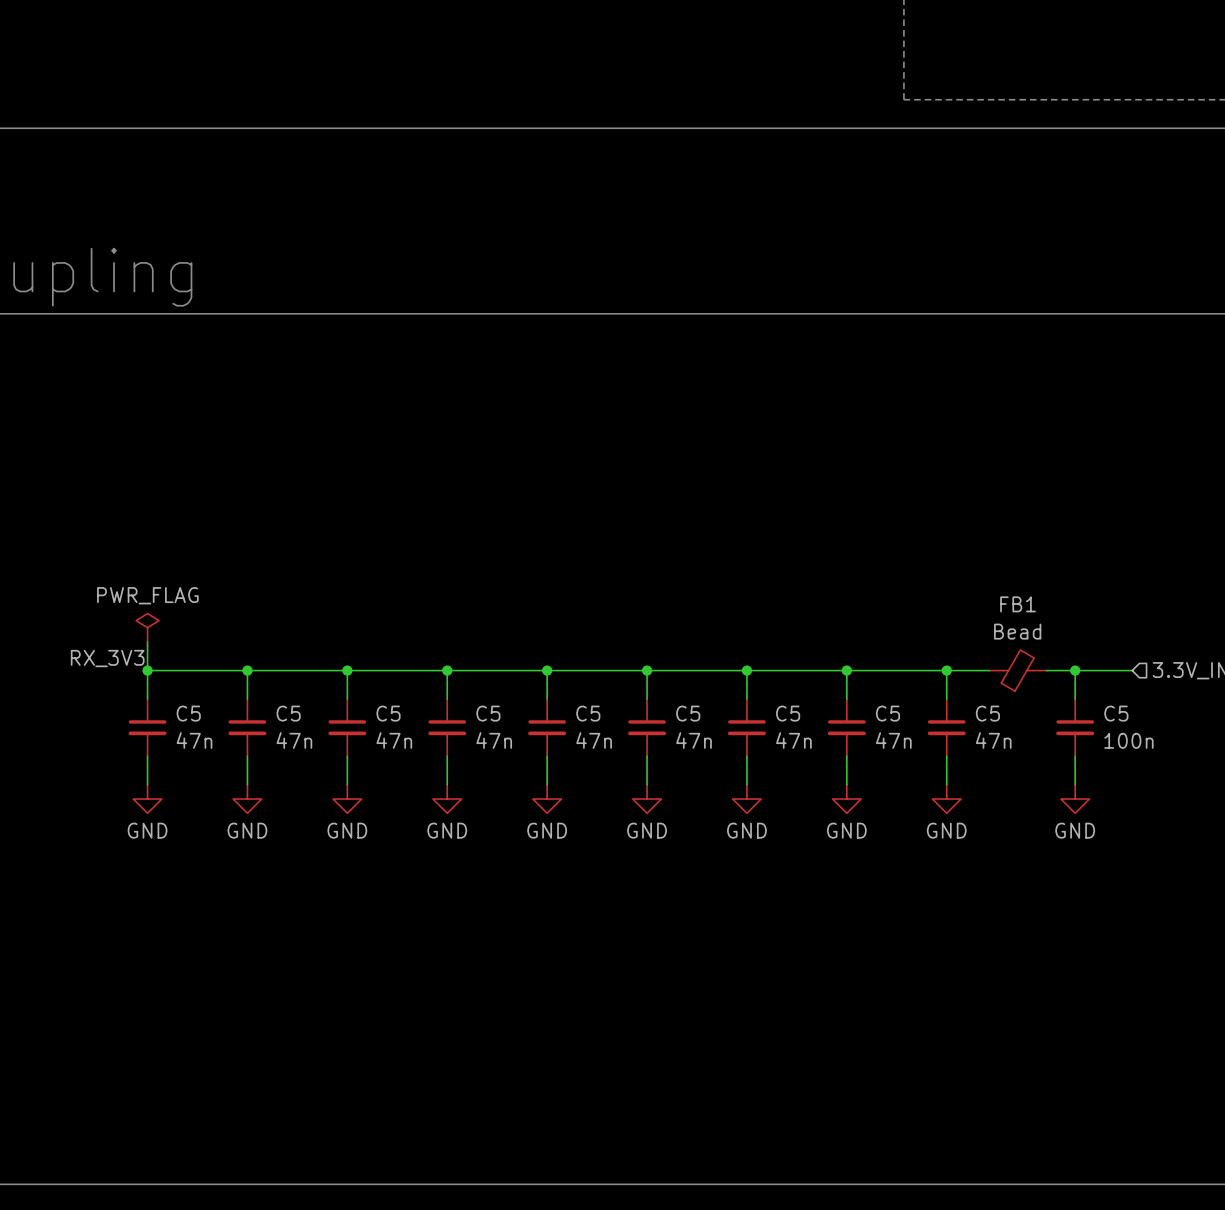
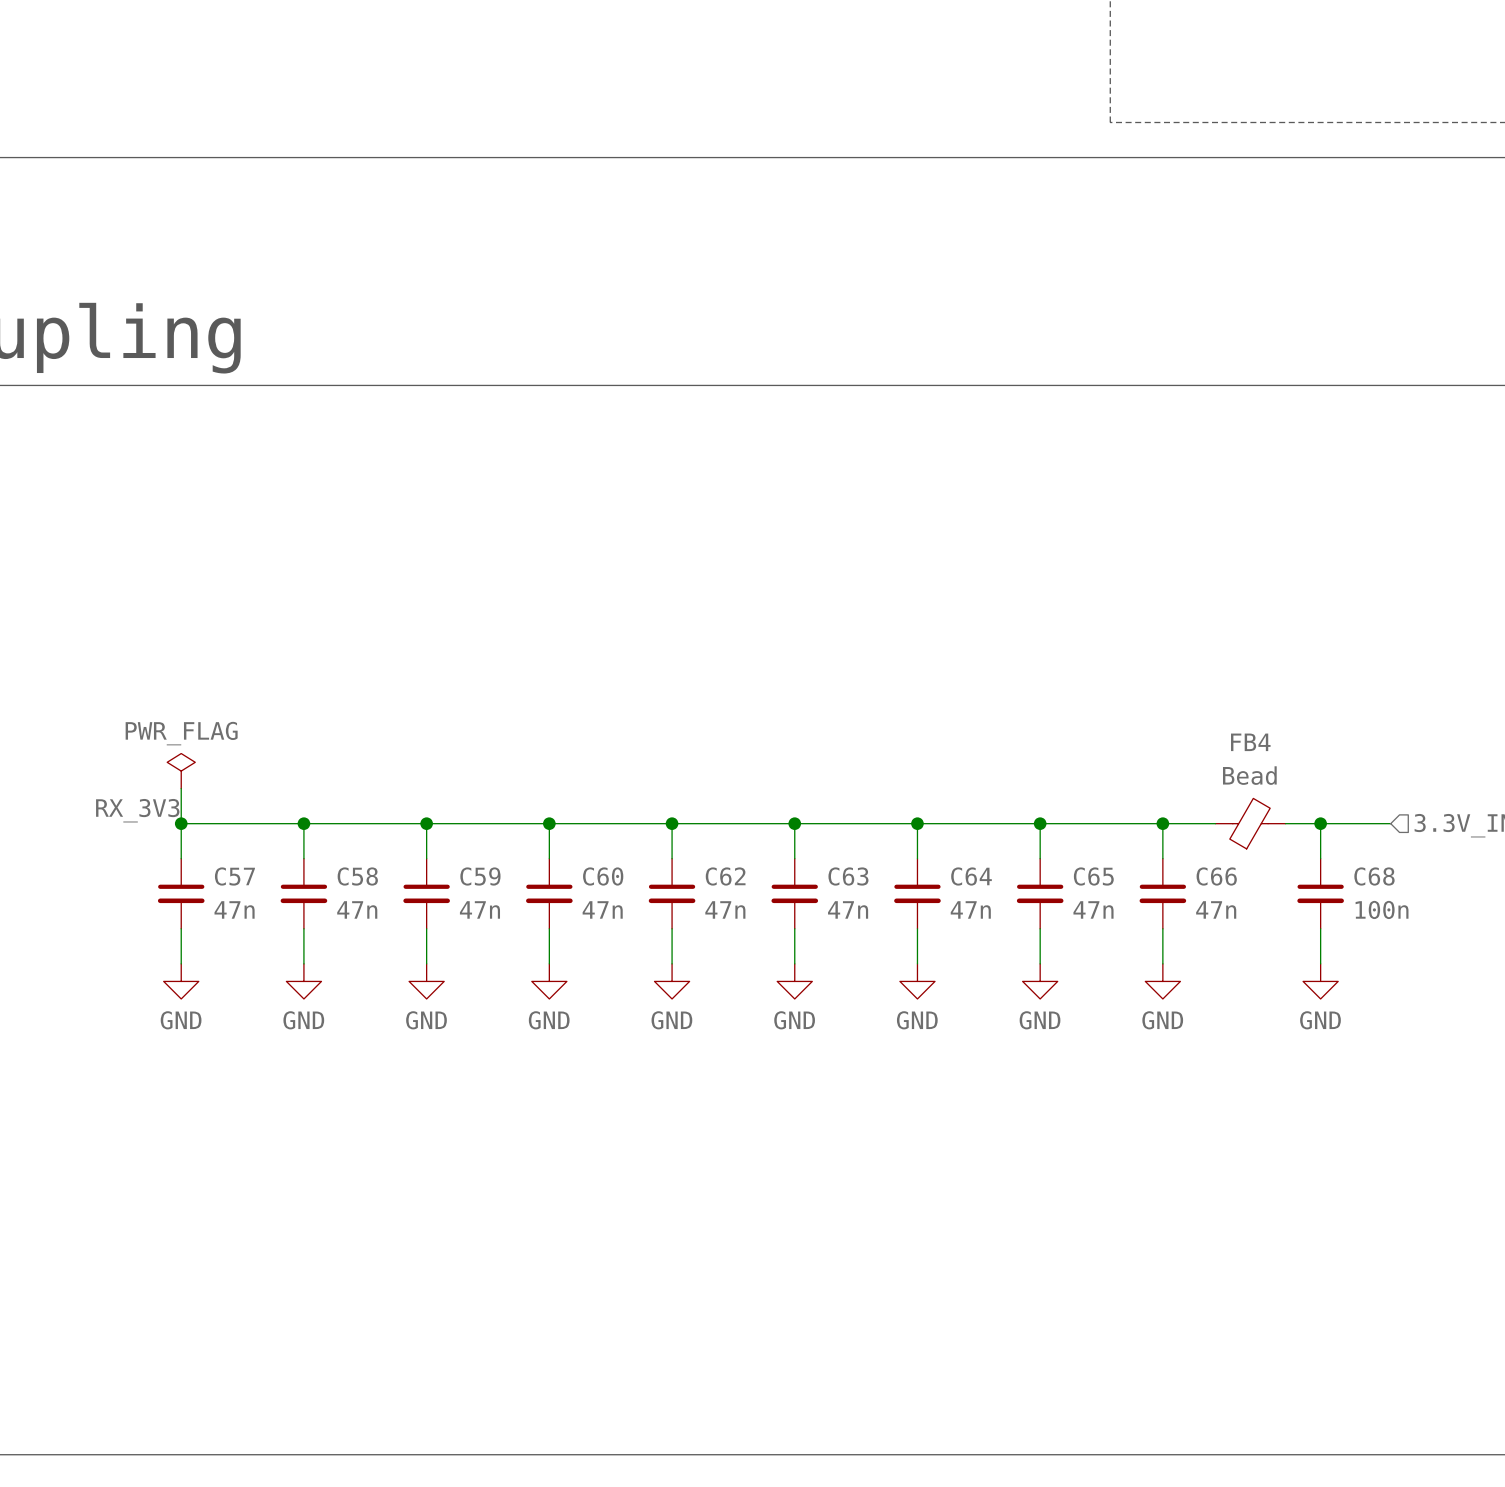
FB1 name: FB1 (1018, 604) -> FB4 (1250, 742)
C5 name: C5 (188, 713) -> C57 (234, 876)
C5 name: C5 (288, 713) -> C58 (357, 876)
C5 name: C5 (388, 713) -> C59 (480, 876)
C5 name: C5 (488, 713) -> C60 (603, 876)
C5 name: C5 (588, 713) -> C62 (725, 876)
C5 name: C5 (688, 713) -> C63 (848, 876)
C5 name: C5 (788, 713) -> C64 (971, 876)
C5 name: C5 (888, 713) -> C65 (1093, 876)
C5 name: C5 (987, 713) -> C66 (1216, 876)
C5 name: C5 (1116, 713) -> C68 (1374, 876)

